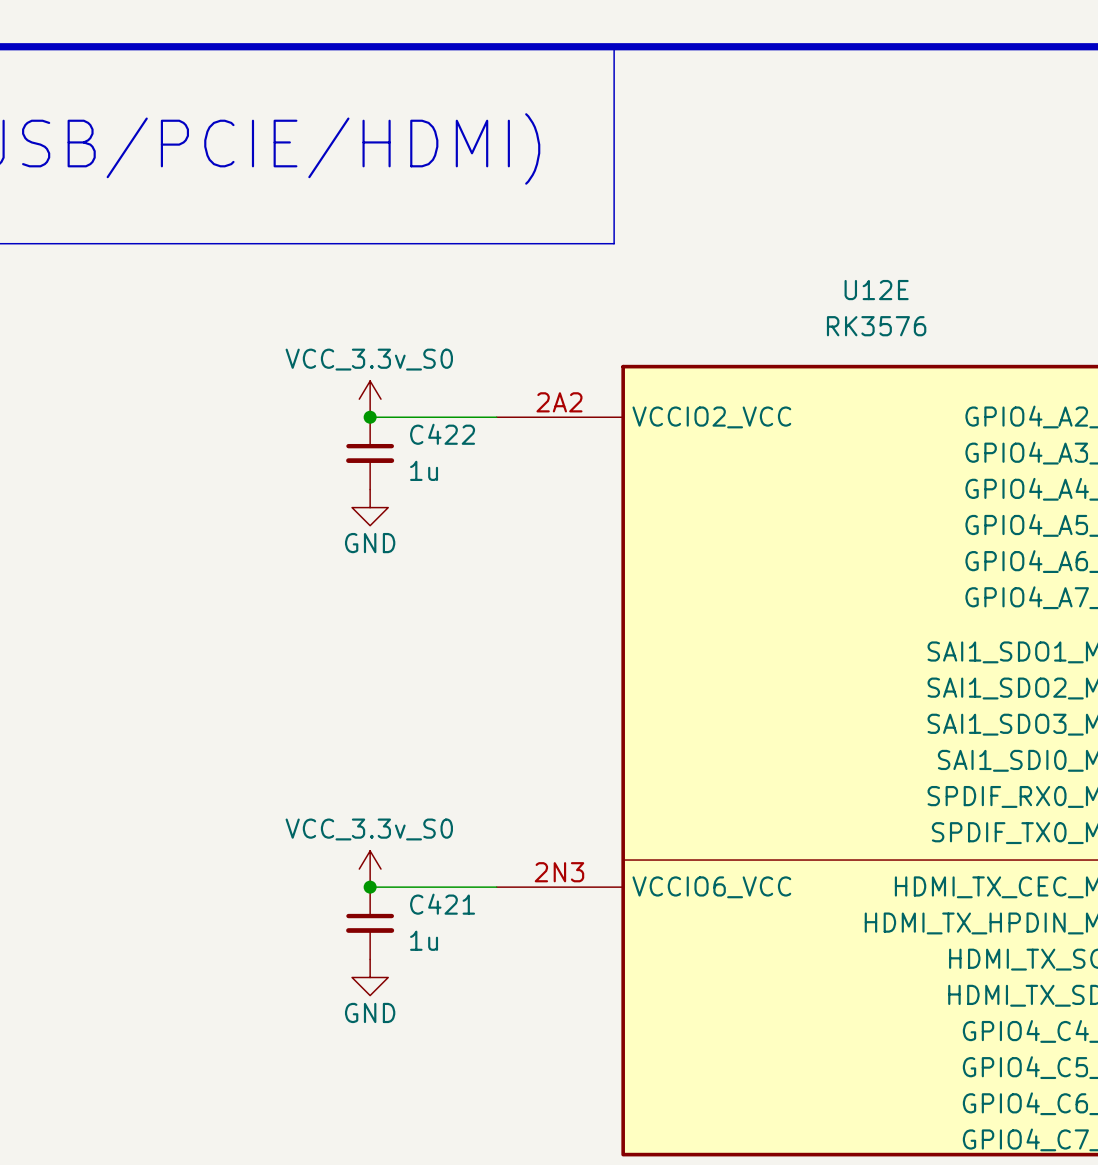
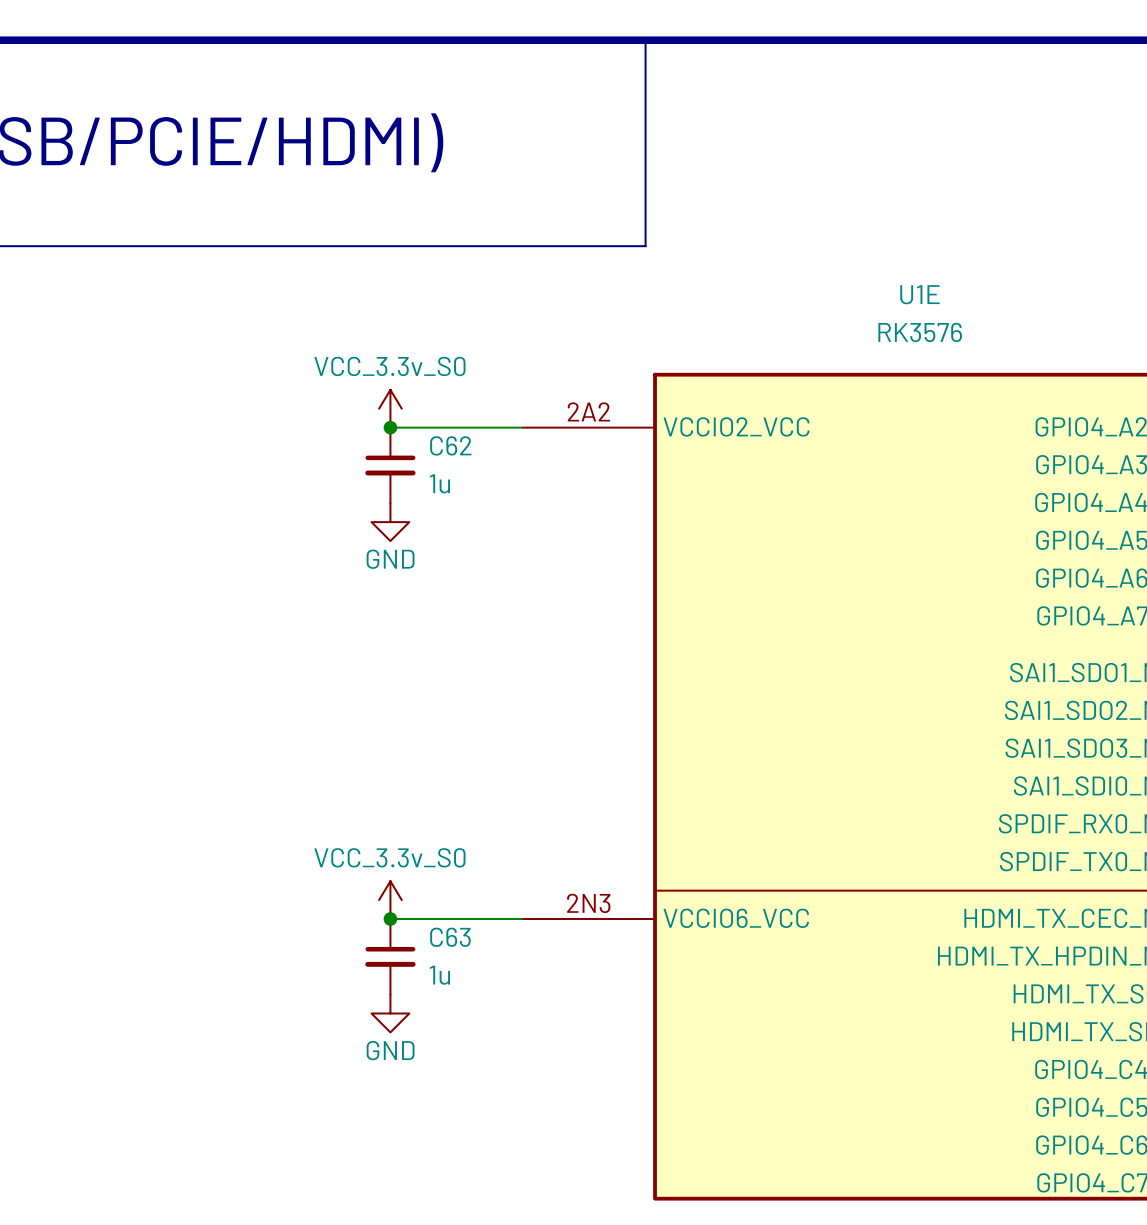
U12E name: U12E (876, 290) -> U1E (919, 294)
C422 name: C422 (442, 434) -> C62 (450, 445)
C421 name: C421 (442, 904) -> C63 (450, 937)

